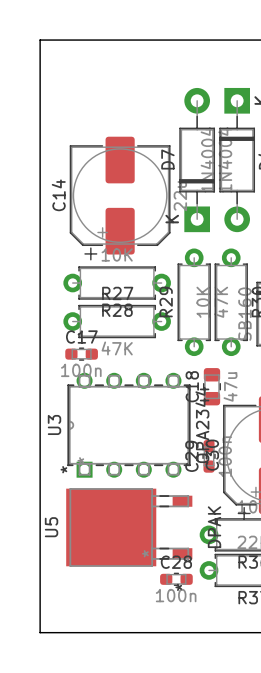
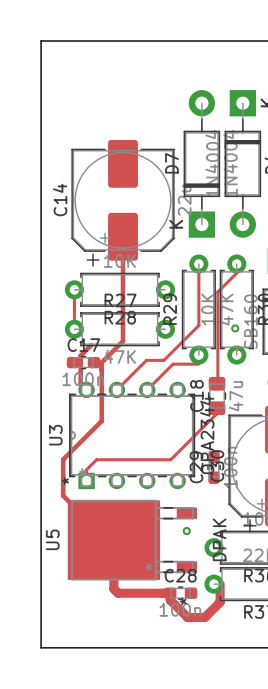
track: none -> (123, 233) (123, 341) (101, 362) (101, 369)
track: none -> (198, 273) (198, 325) (163, 360) (146, 360) (116, 389)
track: none -> (236, 273) (217, 292) (217, 388)
track: none -> (74, 289) (74, 329)
via: none -> (235, 328)
track: none -> (91, 345) (80, 355) (80, 384) (86, 389)
track: none -> (198, 364) (173, 364) (147, 389)
track: none -> (101, 369) (101, 421) (63, 459) (63, 495) (107, 540) (113, 540) (113, 588) (118, 593) (170, 593) (170, 600) (187, 617) (204, 617) (220, 602) (220, 584)
track: none -> (217, 412) (170, 459) (96, 459) (86, 469) (86, 480)
via: none -> (186, 531)

